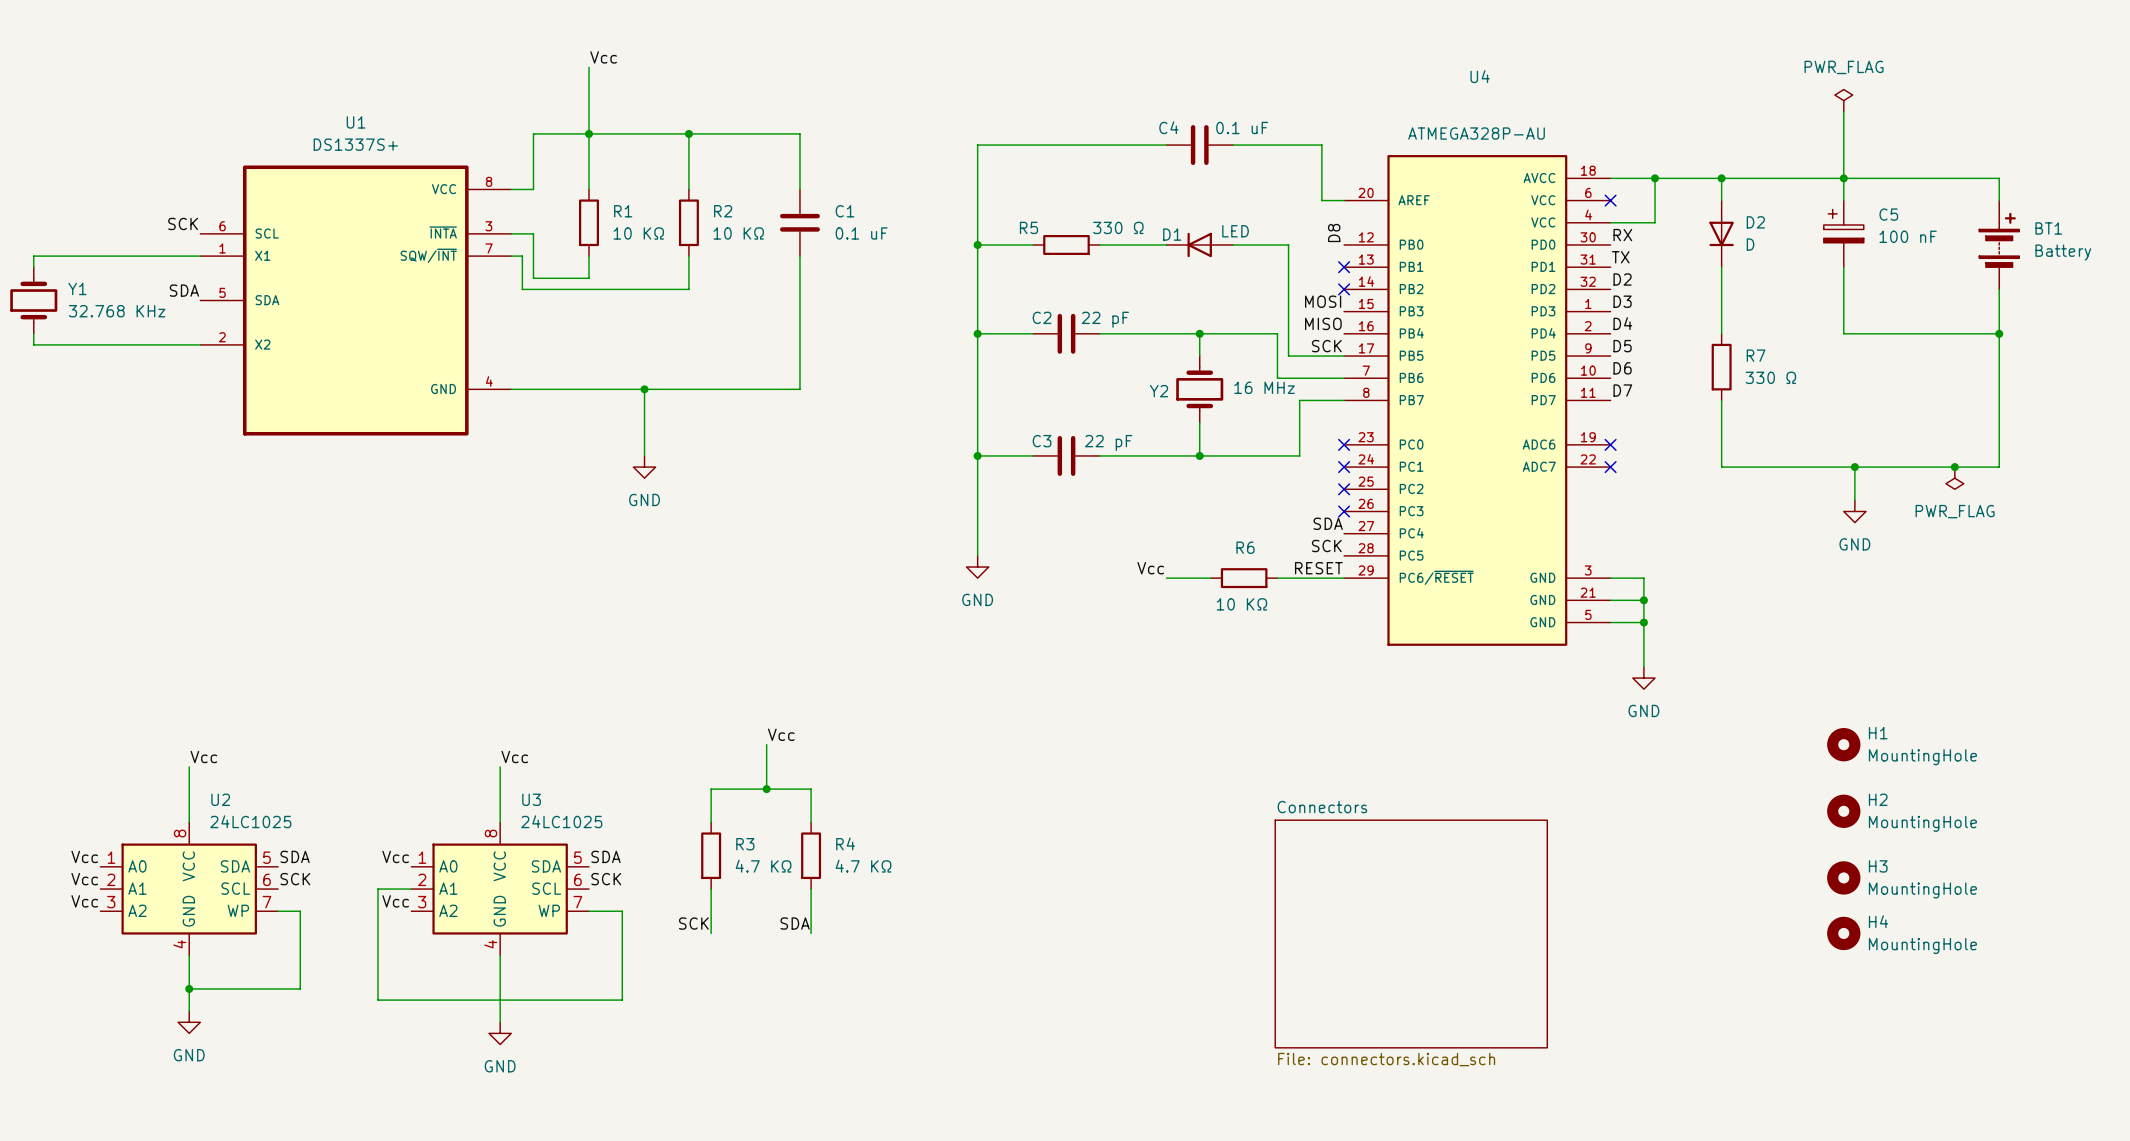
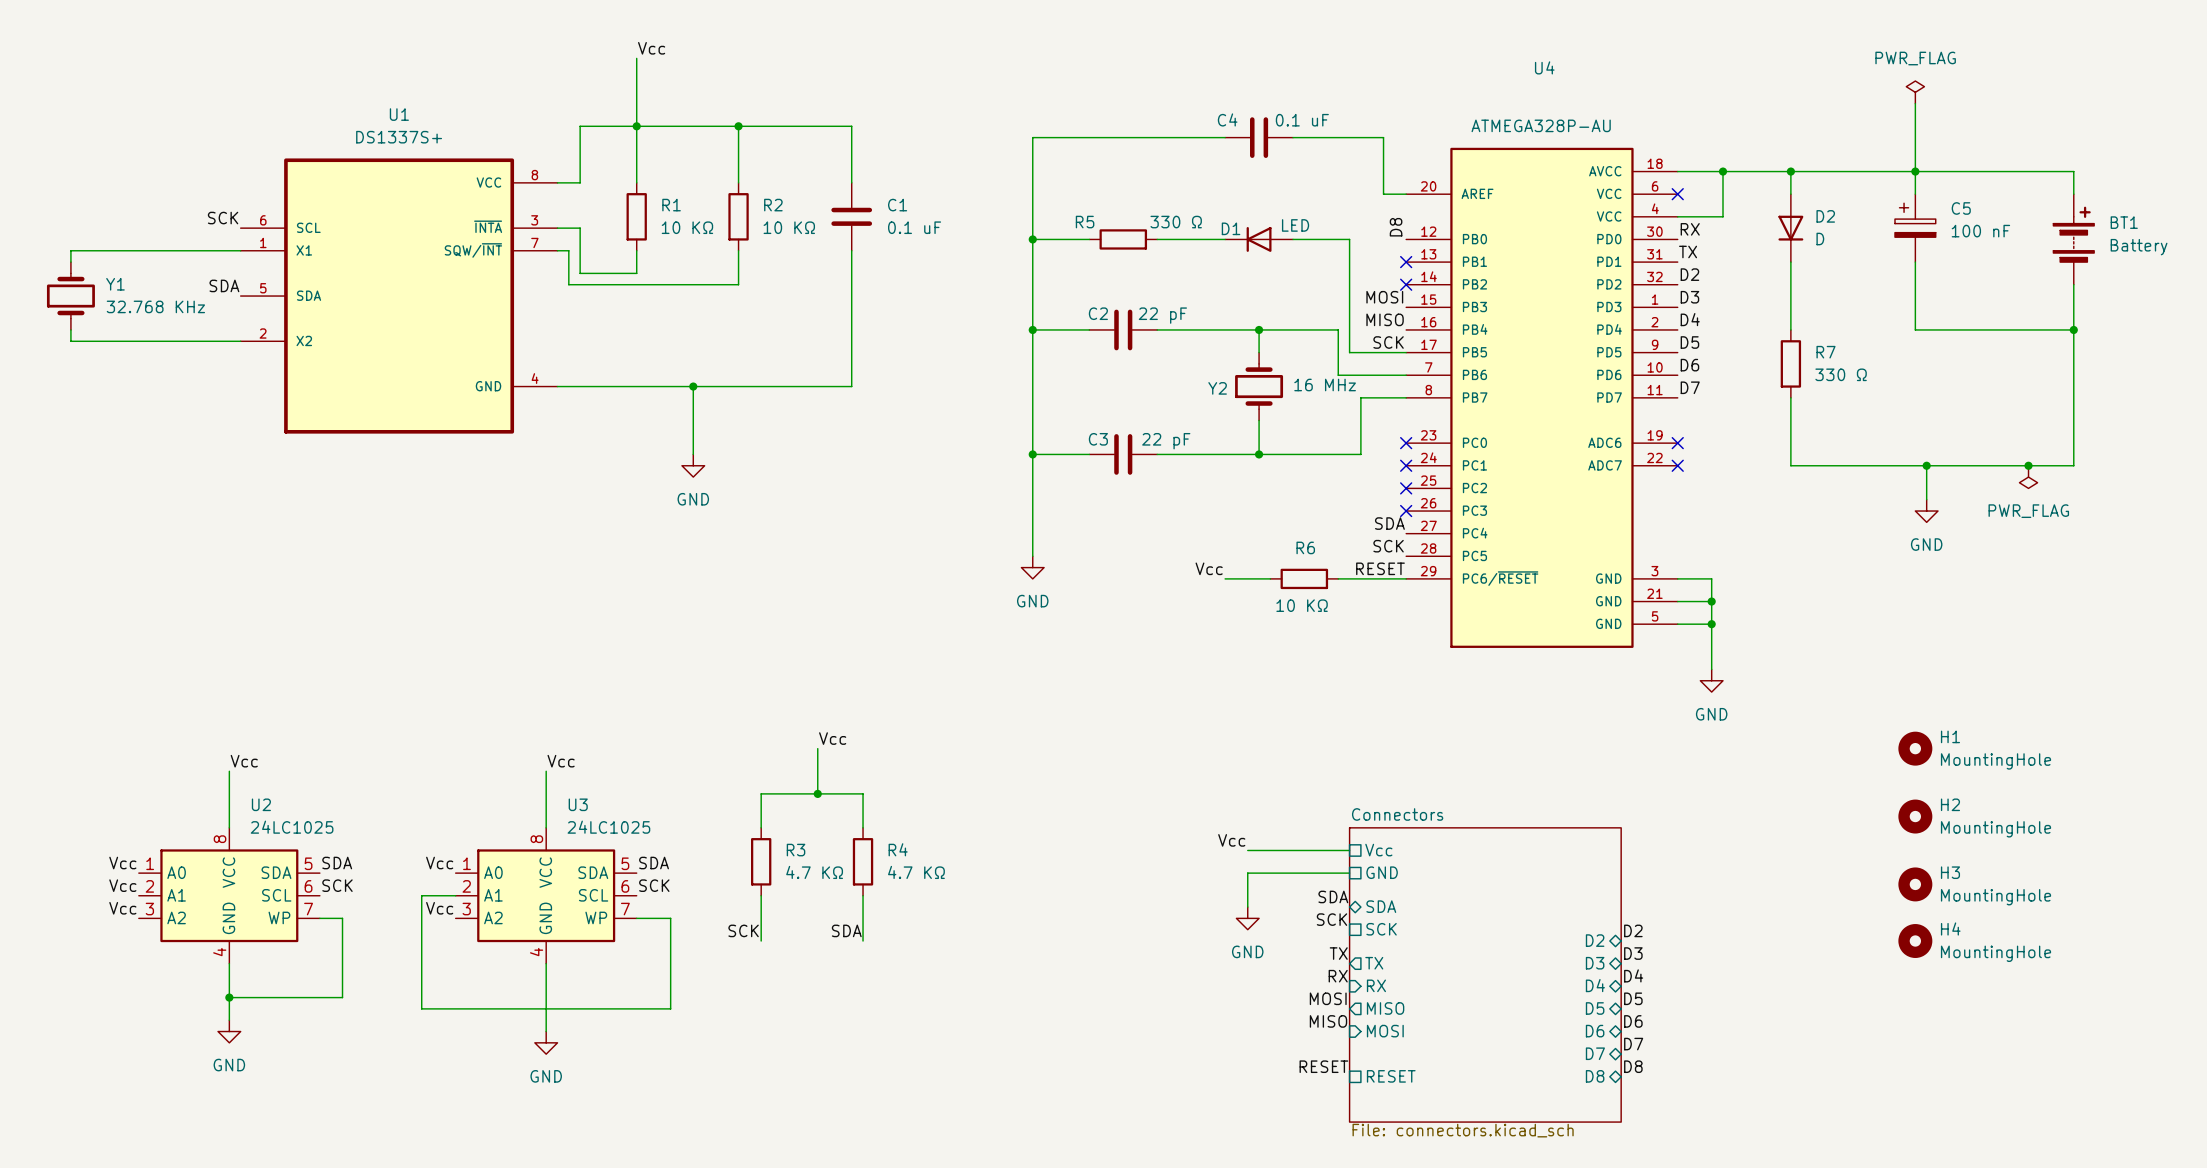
label: none -> Vcc (1231, 840)
wire: none -> (1247, 850) (1349, 850)
sheet pin: none -> Vcc (1378, 850)
wire: none -> (1349, 873) (1247, 873) (1247, 907)
sheet pin: none -> GND (1382, 872)
label: none -> SDA (1333, 896)
sheet pin: none -> SDA (1381, 906)
power symbol: none -> GND (1247, 918)
label: none -> SCK (1331, 919)
sheet pin: none -> SCK (1381, 929)
label: none -> D2 (1633, 930)
sheet pin: none -> D2 (1595, 940)
sheet Connectors: File: connectors.kicad_sch (1411, 934) -> none
label: none -> TX (1338, 953)
label: none -> D3 (1633, 953)
sheet pin: none -> TX (1374, 963)
sheet pin: none -> D3 (1595, 963)
sheet Connectors: none -> File: connectors.kicad_sch (1485, 974)
label: none -> RX (1338, 976)
label: none -> D4 (1633, 975)
sheet pin: none -> RX (1376, 985)
sheet pin: none -> D4 (1595, 985)
label: none -> MOSI (1328, 998)
label: none -> D5 (1633, 998)
sheet pin: none -> MISO (1385, 1008)
sheet pin: none -> D5 (1595, 1008)
label: none -> MISO (1328, 1021)
label: none -> D6 (1633, 1021)
sheet pin: none -> MOSI (1385, 1031)
sheet pin: none -> D6 (1595, 1031)
label: none -> D7 (1633, 1044)
sheet pin: none -> D7 (1595, 1053)
label: none -> RESET (1323, 1066)
label: none -> D8 (1633, 1066)
sheet pin: none -> RESET (1391, 1076)
sheet pin: none -> D8 (1595, 1076)

